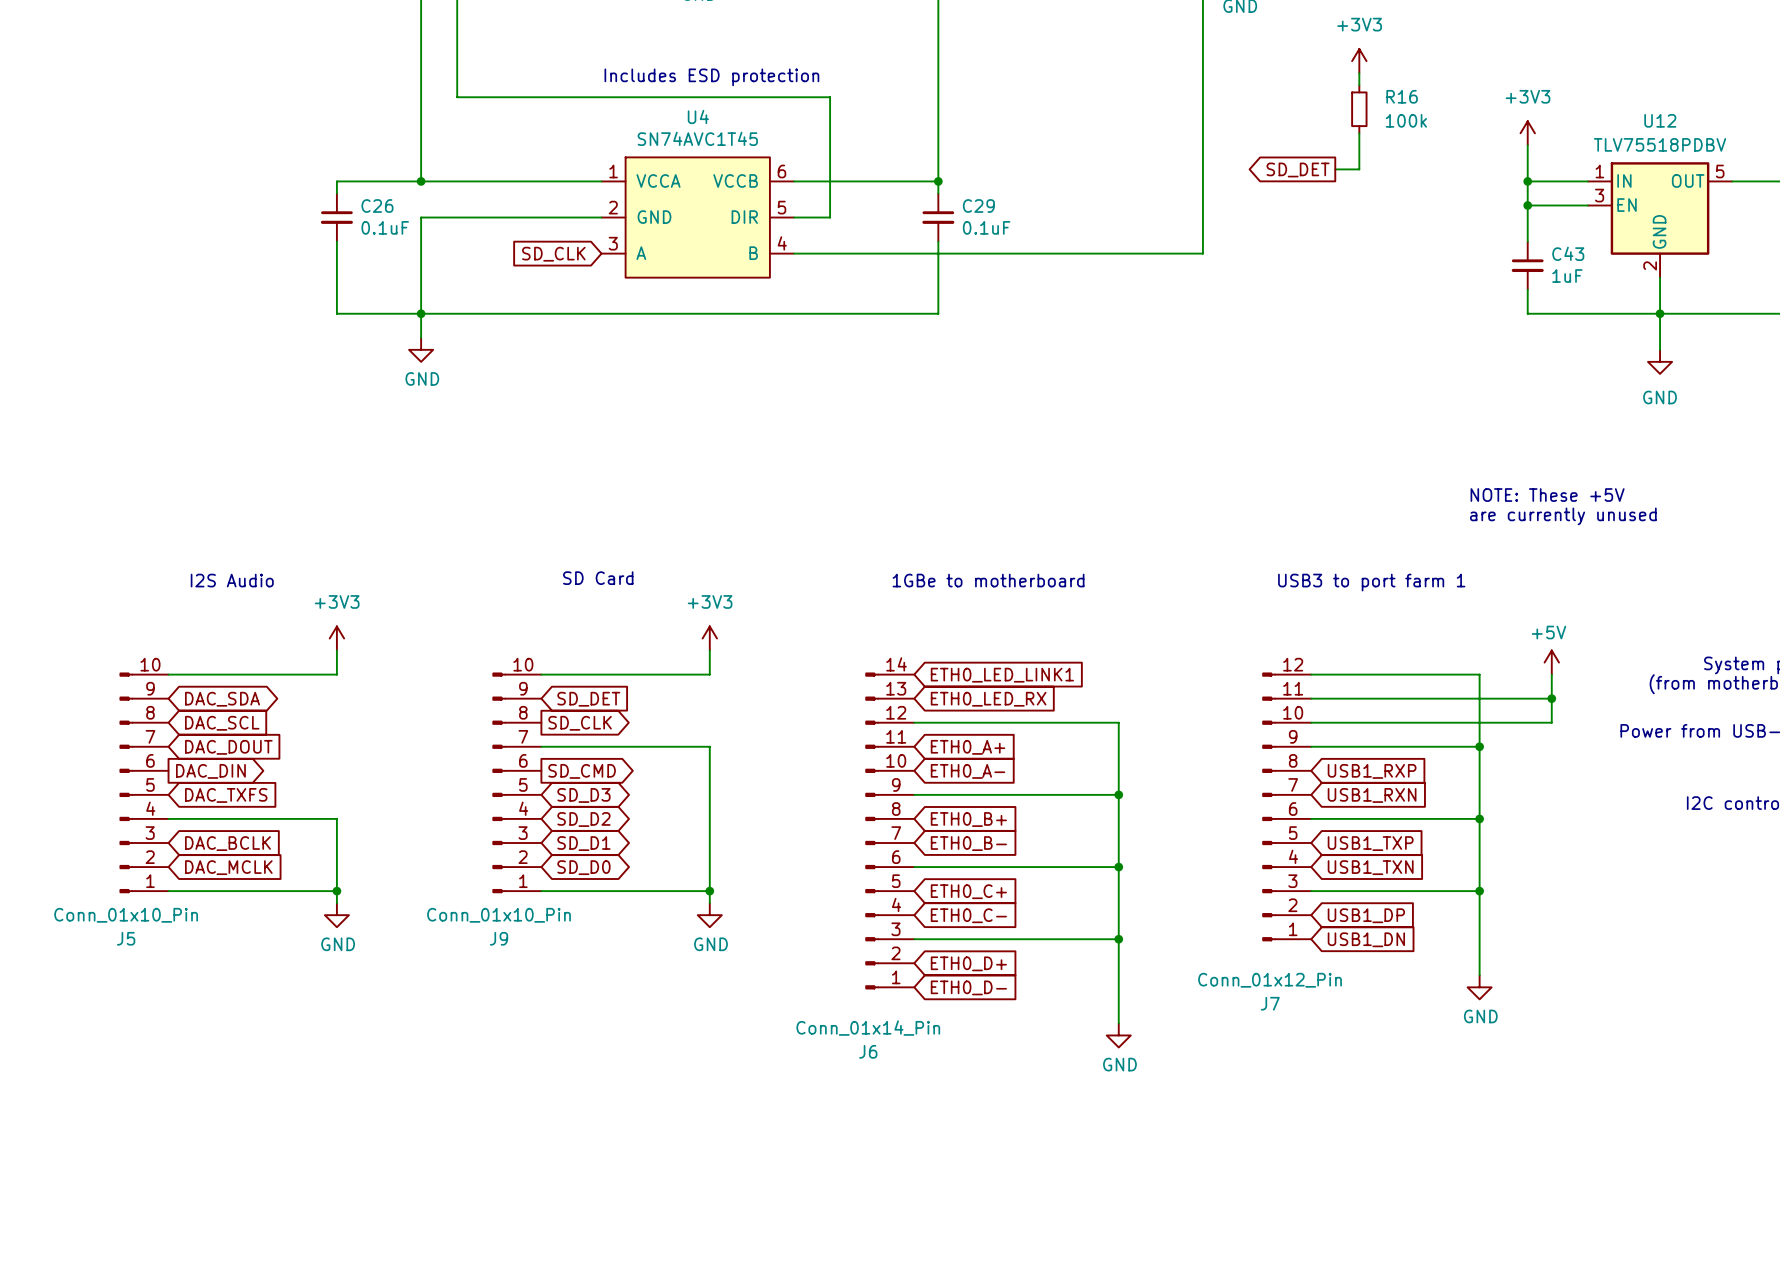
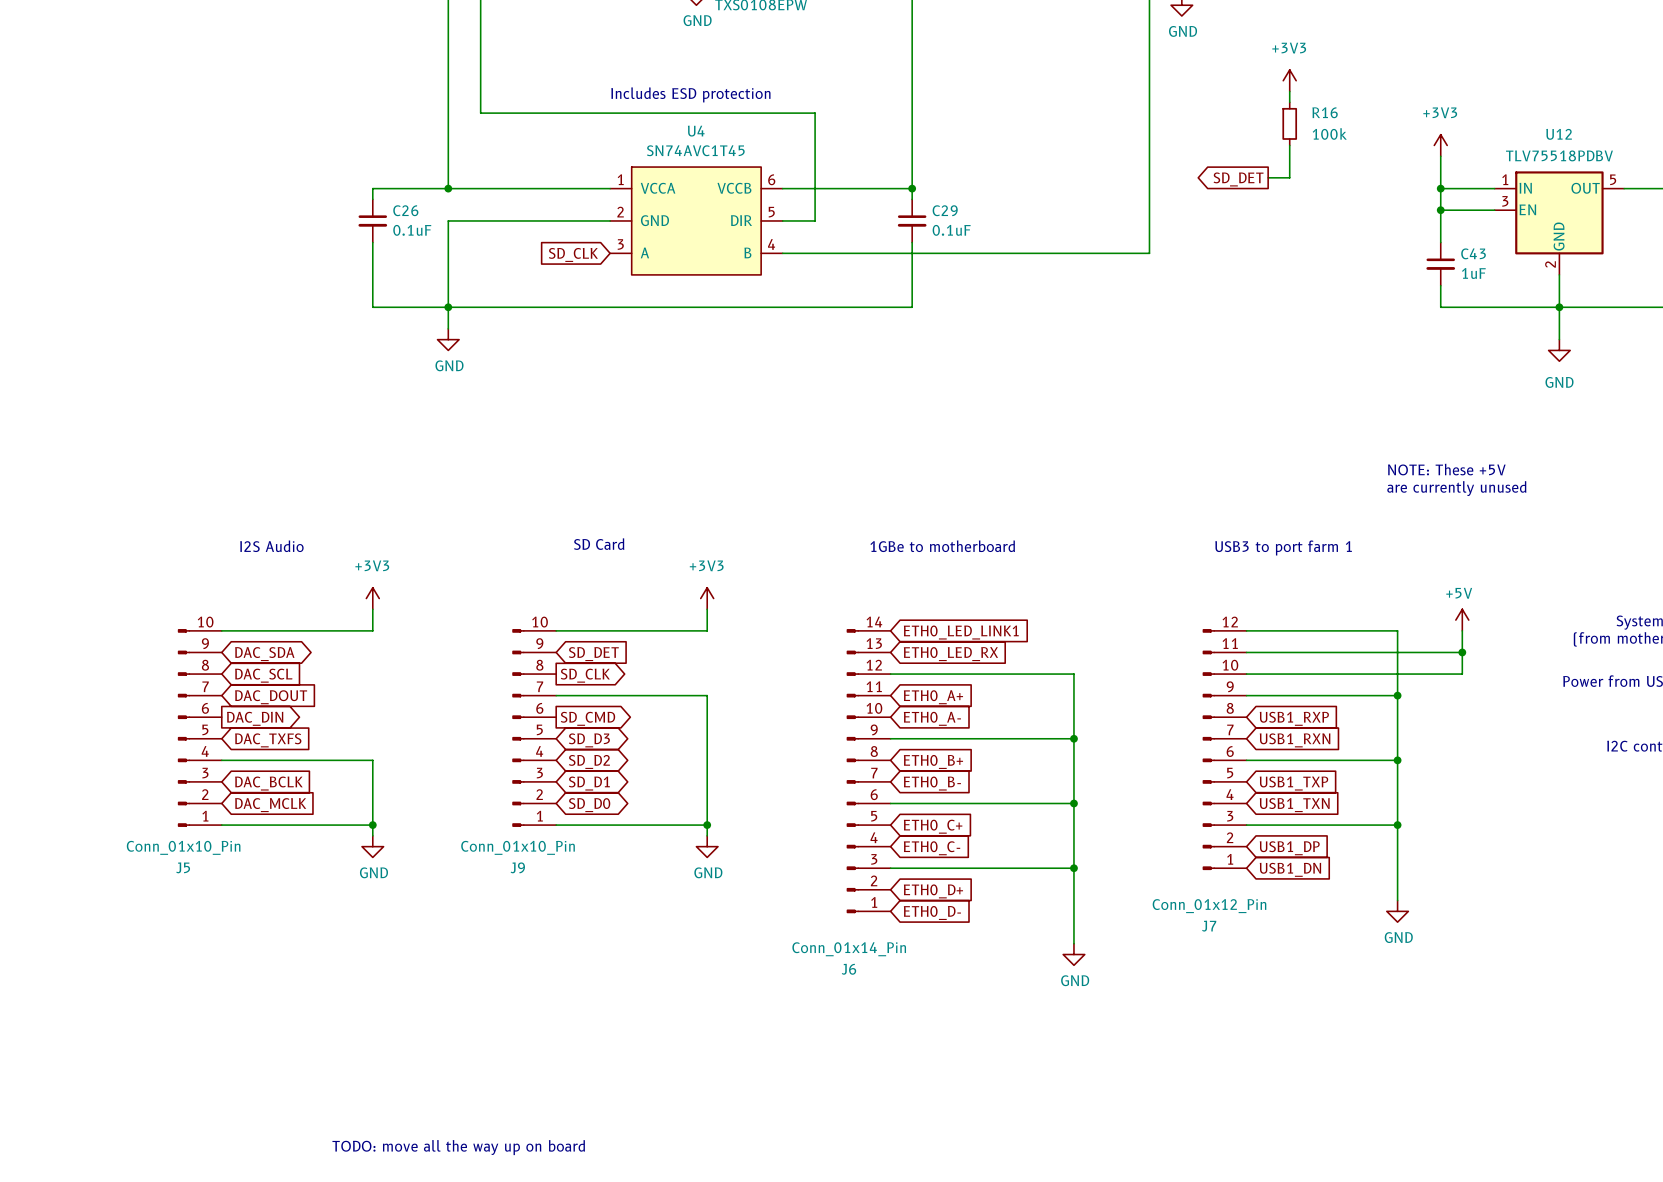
text: none -> TODO: move all the way up on board (458, 1147)

